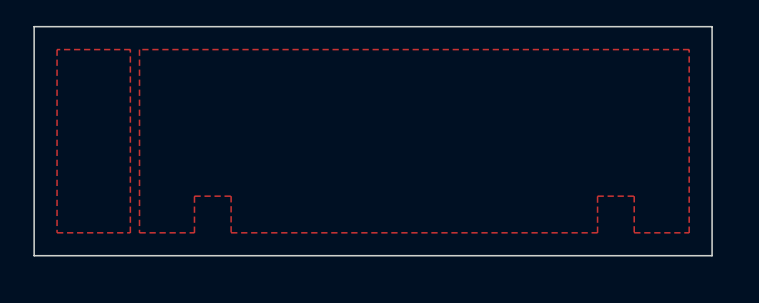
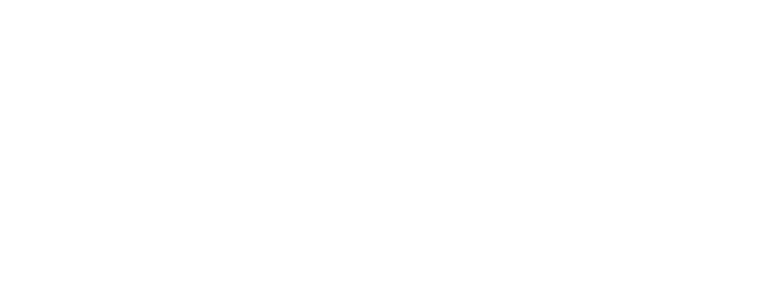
board edge: (34, 26) (712, 26) (712, 255) (34, 255) (34, 26) -> none
top zone outline: (57, 49) (57, 232) (130, 232) (130, 49) (57, 49) -> none
top zone outline: (139, 49) (689, 49) (689, 232) (634, 232) (634, 196) (597, 196) (597, 232) (231, 232) (231, 196) (194, 196) (194, 232) (139, 232) (139, 49) -> none

